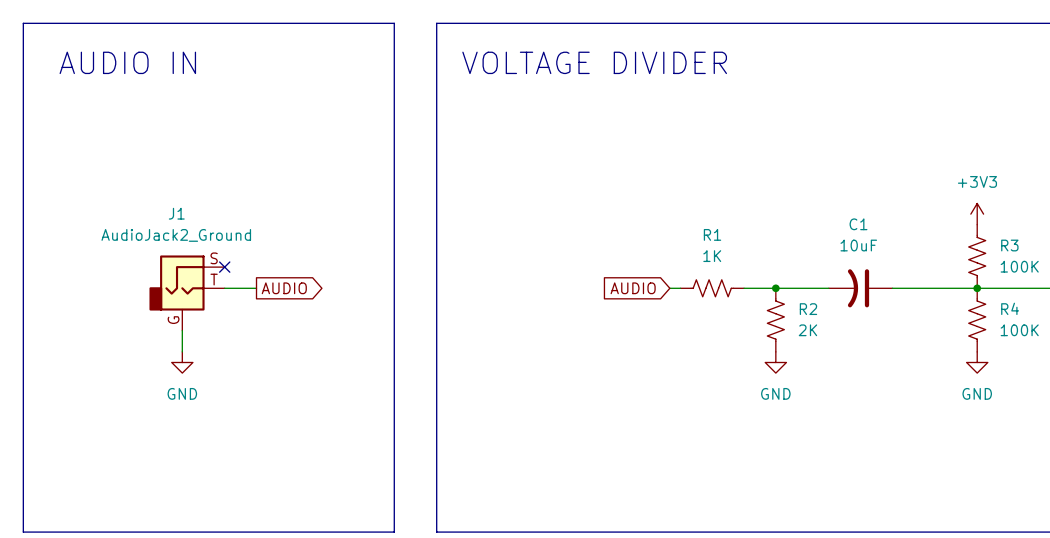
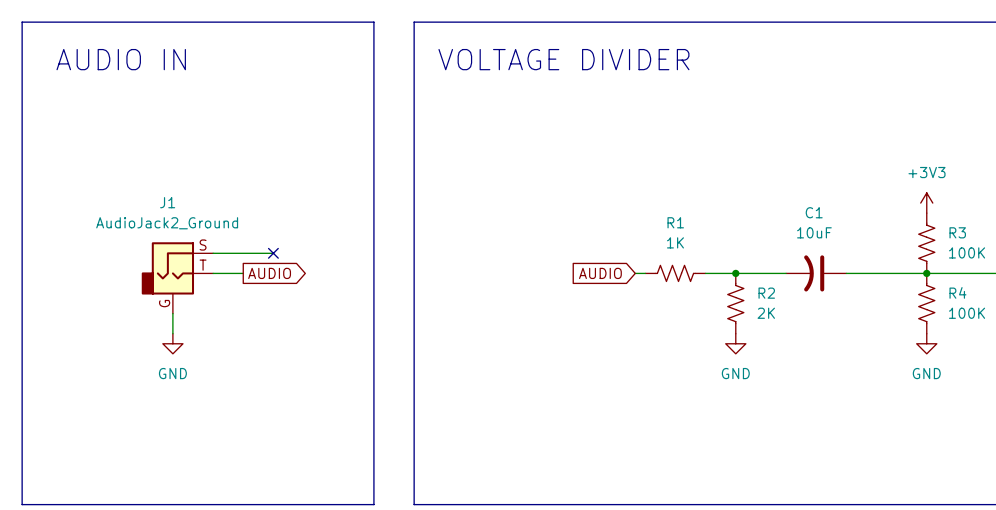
wire: none -> (213, 253) (273, 253)
no-connect mark: (224, 267) -> none
no-connect mark: none -> (273, 253)

